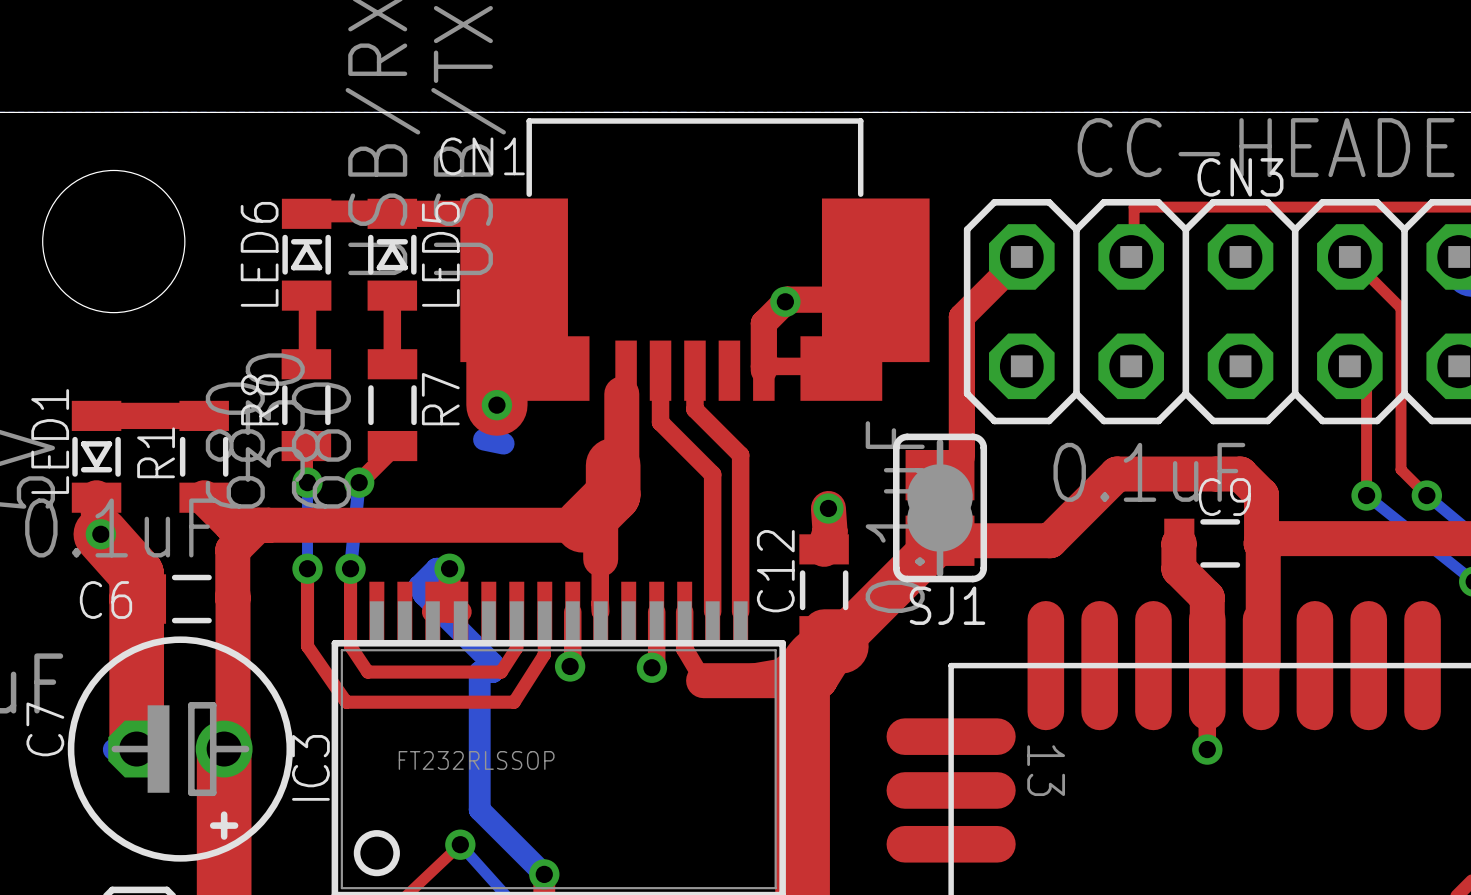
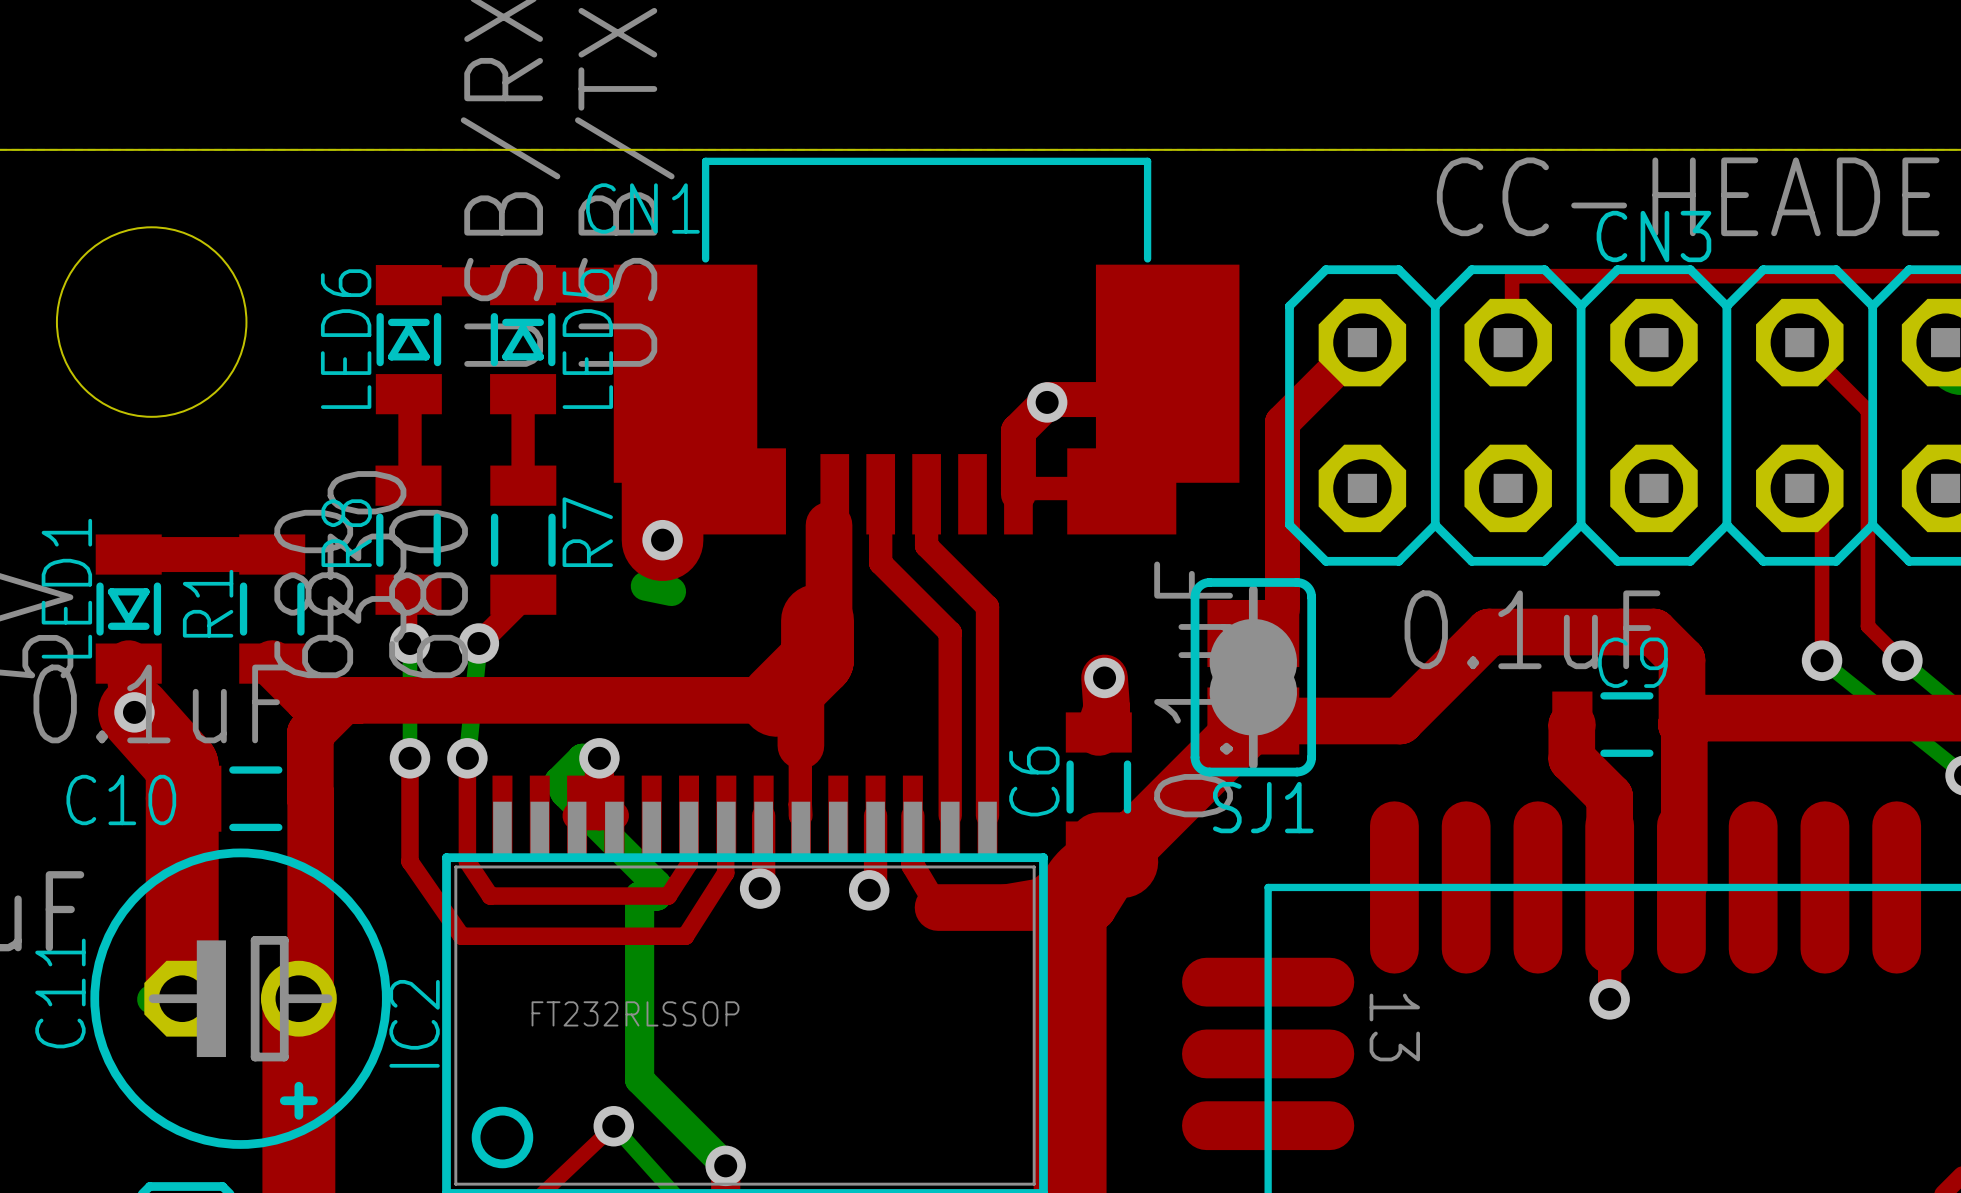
C12 name: C12 (775, 571) -> C6 (1034, 781)
C6 name: C6 (105, 600) -> C10 (121, 800)
C7 name: C7 (45, 729) -> C11 (60, 993)
IC3 name: IC3 (310, 767) -> IC2 (414, 1023)

